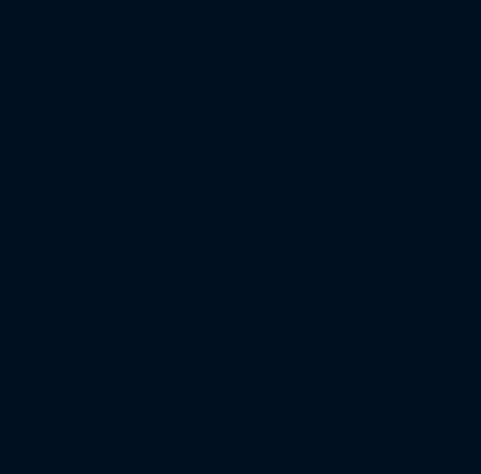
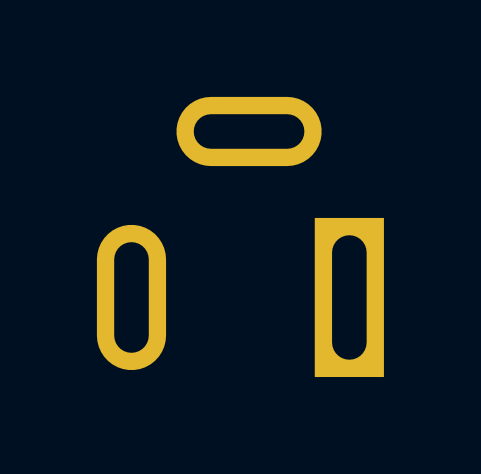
part: none -> (240, 236)

